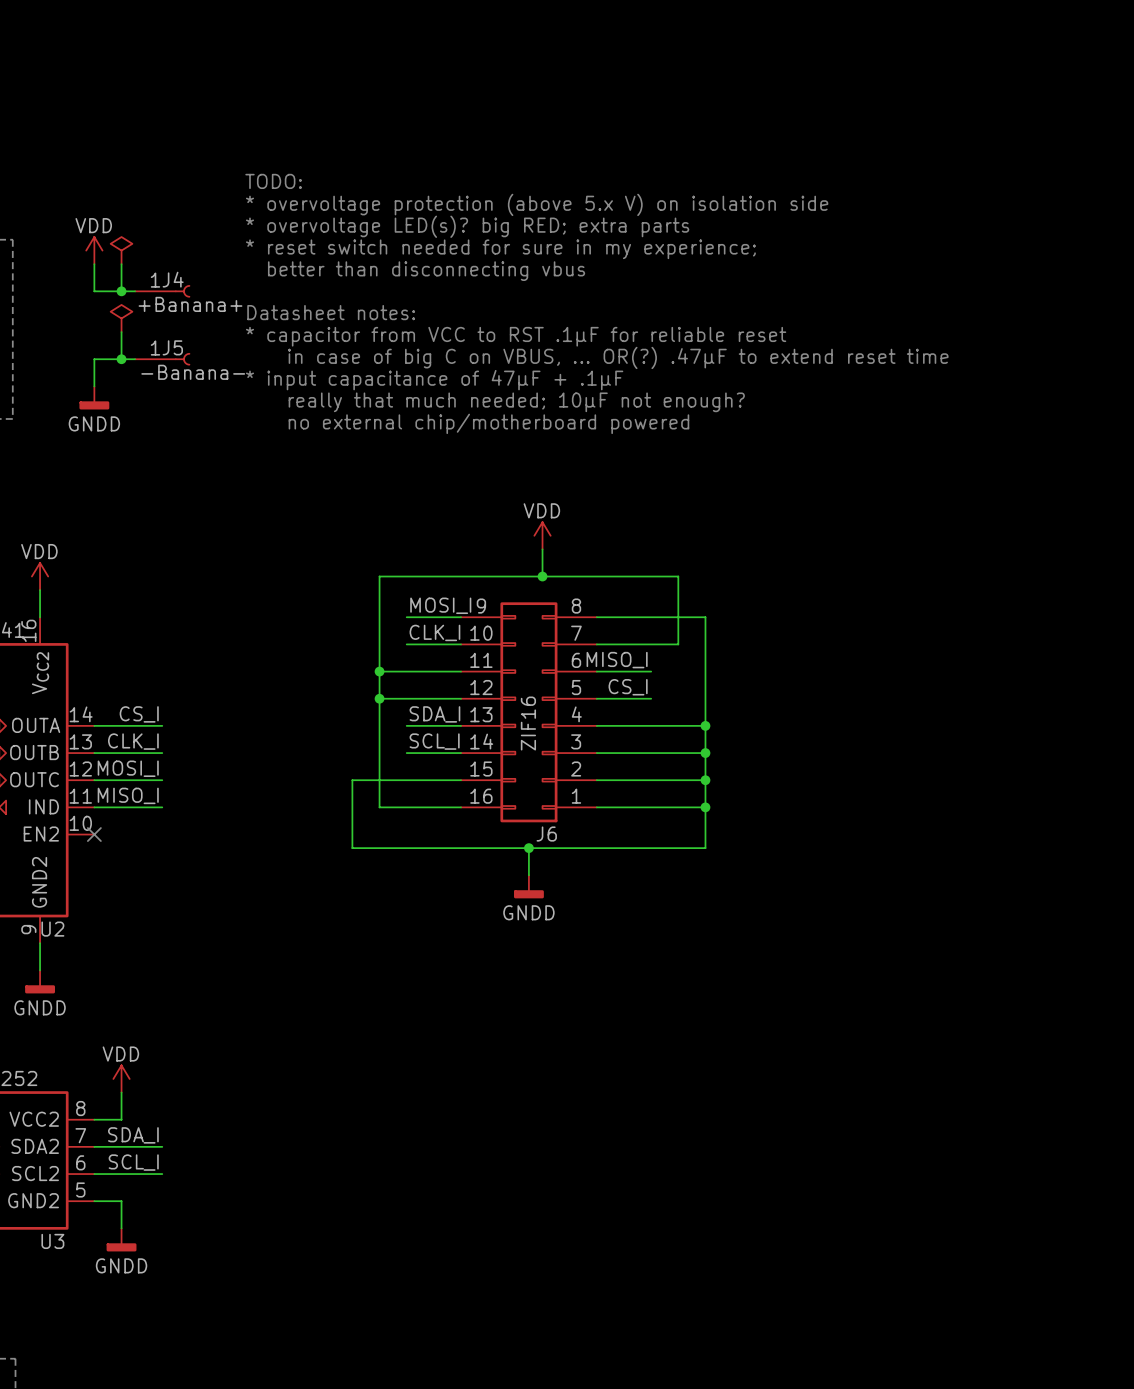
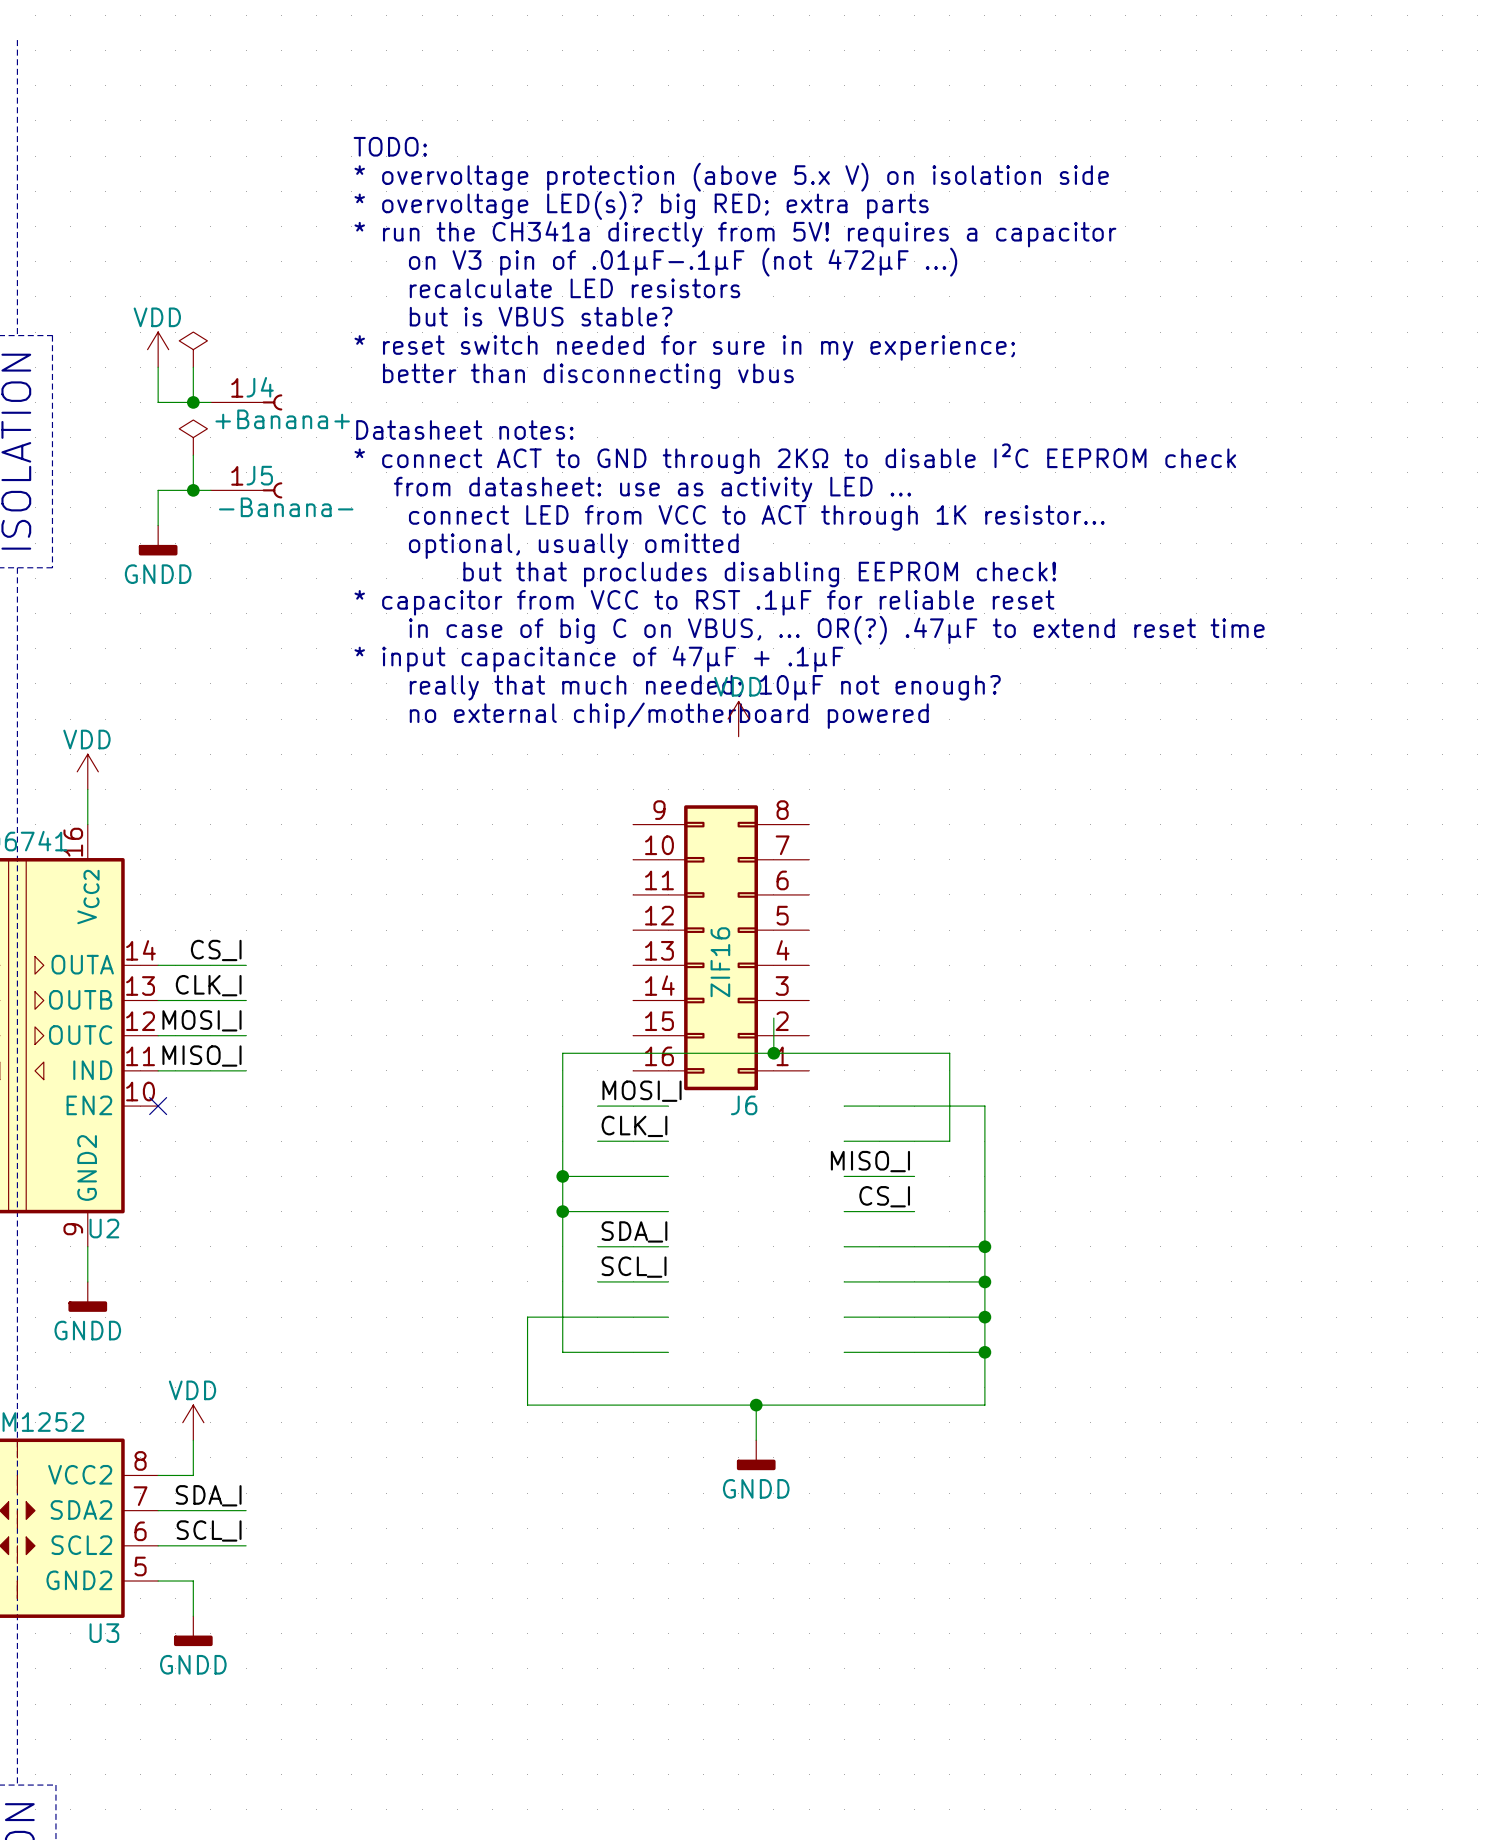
text: none -> TODO: (390, 146)
text: none -> * overvoltage protection (above 5.x V) on isolation side (731, 177)
text: none -> * overvoltage LED(s)? big RED; extra parts (641, 205)
text: none -> * run the CH341a directly from 5V! requires a capacitor (735, 234)
text: TODO: (273, 181) -> on V3 pin of .01µF-.1µF (not 472µF ...) (683, 262)
text: * overvoltage protection (above 5.x V) on isolation side (537, 204) -> recalculate LED resistors (575, 288)
text: * overvoltage LED(s)? big RED; extra parts (467, 226) -> but is VBUS stable? (541, 316)
text: * capacitor from VCC to RST .1µF for reliable reset (516, 336) -> * connect ACT to GND through 2KΩ to disable I²C EEPROM check (795, 458)
text: in case of big C on VBUS, ... OR(?) .47µF to extend reset time (618, 357) -> from datasheet: use as activity LED ... (652, 489)
text: * input capacitance of 47µF + .1µF (434, 380) -> connect LED from VCC to ACT through 1K resistor... (756, 517)
text: really that much needed; 10µF not enough? (516, 402) -> optional, usually omitted (573, 546)
text: no external chip/motherboard powered (488, 423) -> but that procludes disabling EEPROM check! (759, 574)
text: none -> * capacitor from VCC to RST .1µF for reliable reset (704, 602)
text: none -> in case of big C on VBUS, ... OR(?) .47µF to extend reset time (836, 630)
text: none -> * input capacitance of 47µF + .1µF (598, 659)
text: none -> really that much needed; 10µF not enough? (705, 687)
text: none -> no external chip/motherboard powered (669, 715)
wire: (542, 549) (542, 576) -> (773, 1018) (773, 1053)
junction: (542, 576) -> none
label position: MOSI_I (440, 605) -> MOSI_I (642, 1091)
wire: (406, 617) (461, 617) -> (597, 1106) (668, 1106)
wire: (596, 617) (705, 617) (705, 793) -> (668, 1352) (562, 1352) (562, 1053) (949, 1053)
label position: CLK_I (434, 632) -> CLK_I (634, 1126)
wire: (406, 644) (461, 644) -> (597, 1141) (668, 1141)
wire: (596, 644) (678, 644) (678, 576) (379, 576) (379, 807) (461, 807) -> none
label position: MISO_I (617, 660) -> MISO_I (870, 1161)
wire: (379, 671) (461, 671) -> (562, 1176) (668, 1176)
junction: (379, 671) -> none
wire: (596, 671) (651, 671) -> (844, 1176) (914, 1176)
label position: CS_I (628, 687) -> CS_I (884, 1196)
wire: (379, 698) (461, 698) -> (562, 1211) (668, 1211)
junction: (379, 698) -> none
wire: (596, 698) (651, 698) -> (844, 1211) (914, 1211)
label position: SDA_I (434, 714) -> SDA_I (634, 1231)
wire: (406, 725) (461, 725) -> (597, 1246) (668, 1246)
wire: (596, 725) (705, 725) -> (844, 1246) (984, 1246)
junction: (705, 725) -> none
label position: SCL_I (434, 741) -> SCL_I (634, 1267)
wire: (406, 753) (461, 753) -> (597, 1281) (668, 1281)
wire: (596, 753) (705, 753) -> (844, 1281) (984, 1281)
junction: (705, 753) -> none
wire: (461, 780) (352, 780) (352, 848) (705, 848) -> (844, 1141) (949, 1141) (949, 1123)
wire: (596, 780) (705, 780) -> (844, 1317) (984, 1317)
junction: (705, 780) -> none
junction: none -> (773, 1053)
wire: (596, 807) (705, 807) -> (844, 1352) (984, 1352)
junction: (705, 807) -> none
wire: none -> (844, 1106) (984, 1106) (984, 1405) (527, 1405) (527, 1317) (668, 1317)
wire: (528, 848) (528, 875) -> (756, 1405) (756, 1440)
junction: (528, 848) -> none
power symbol position: GNDD (528, 886) -> GNDD (756, 1455)
junction: none -> (562, 1176)
junction: none -> (562, 1211)
junction: none -> (984, 1246)
junction: none -> (984, 1281)
junction: none -> (984, 1317)
junction: none -> (984, 1352)
junction: none -> (756, 1405)

